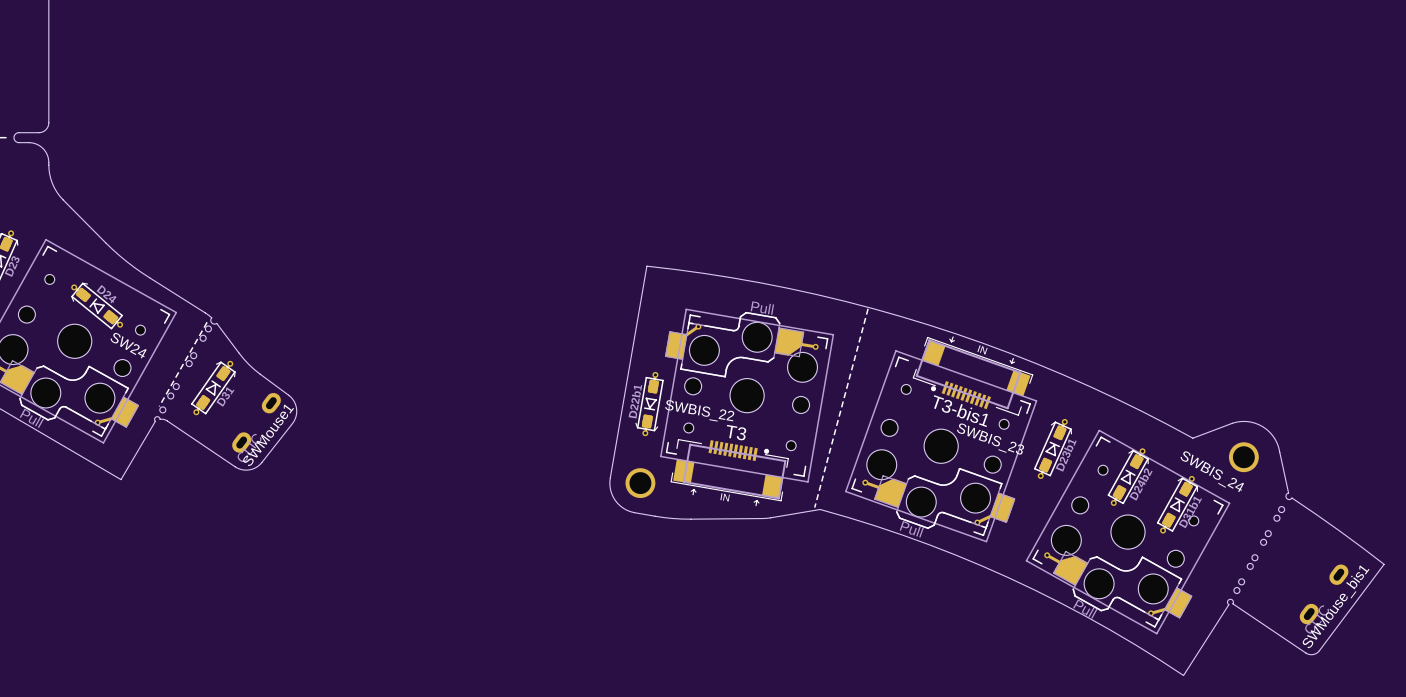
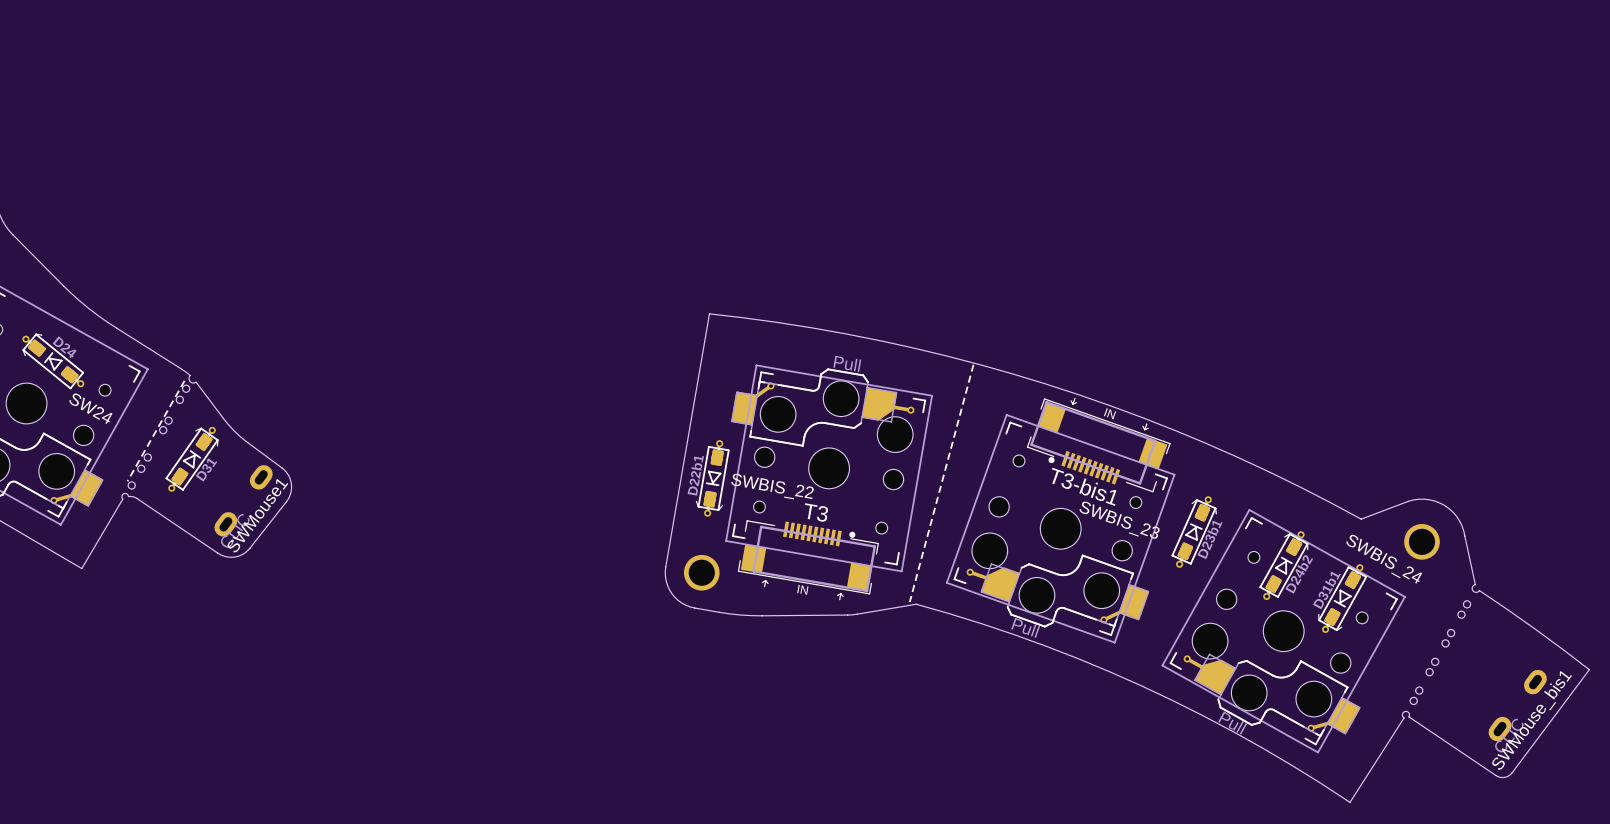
D31b1 rotation: 0° (1177, 504) -> 180° (1342, 598)

